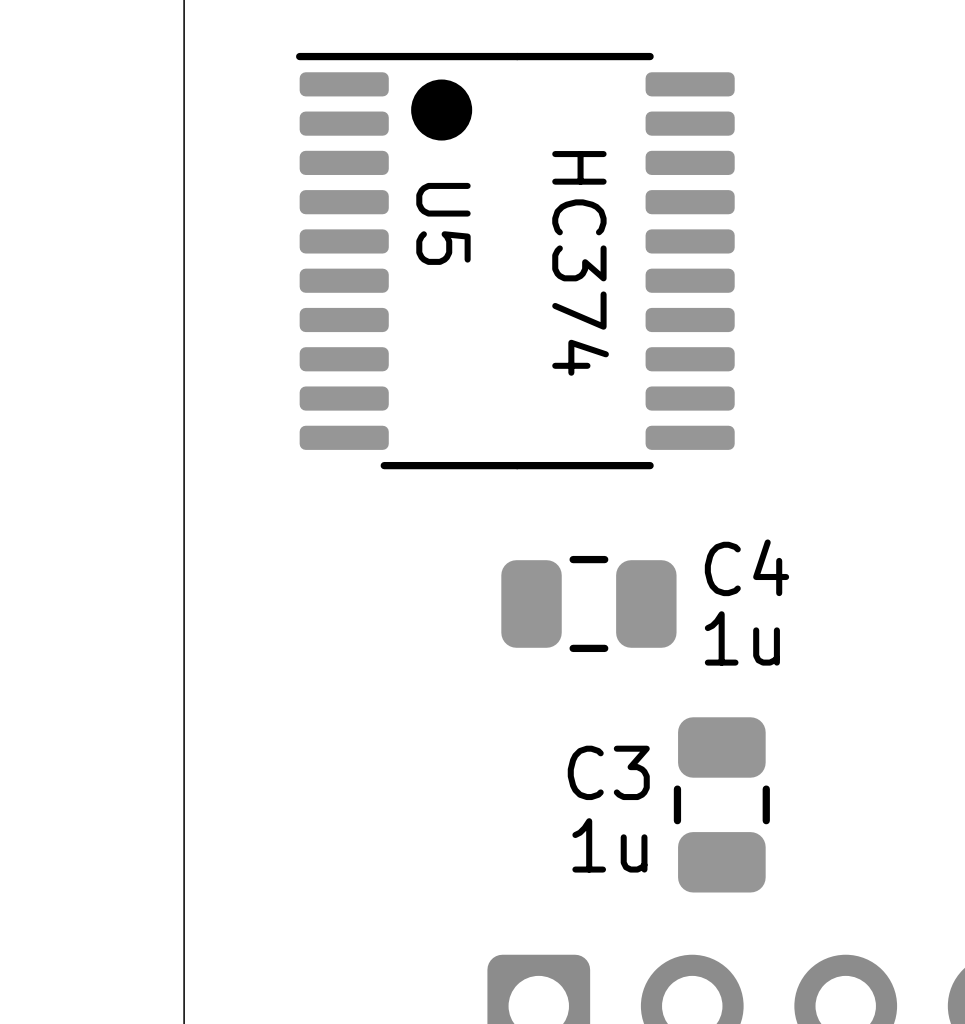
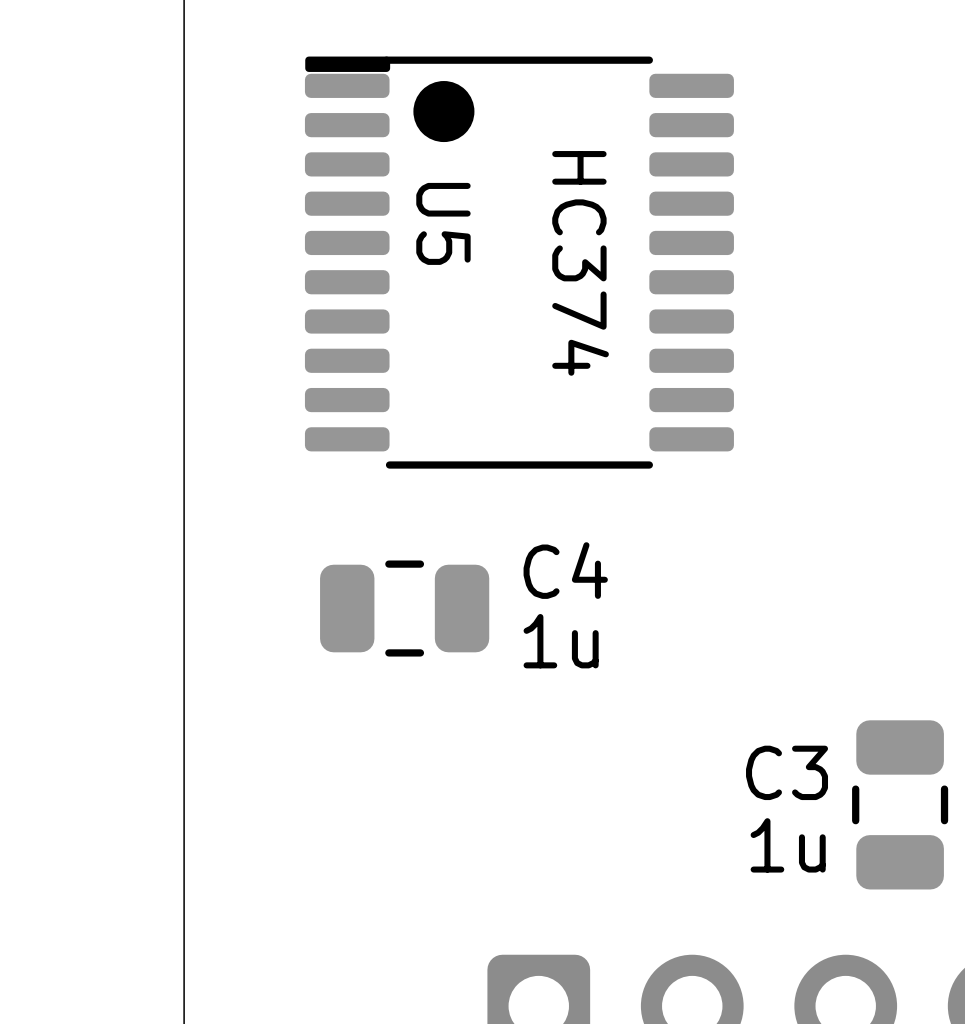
U5 footprint: [296, 52, 735, 470] -> [304, 56, 734, 469]
C4 footprint: [501, 555, 677, 653] -> [320, 560, 490, 657]
C3 footprint: [673, 717, 770, 893] -> [852, 720, 949, 890]

